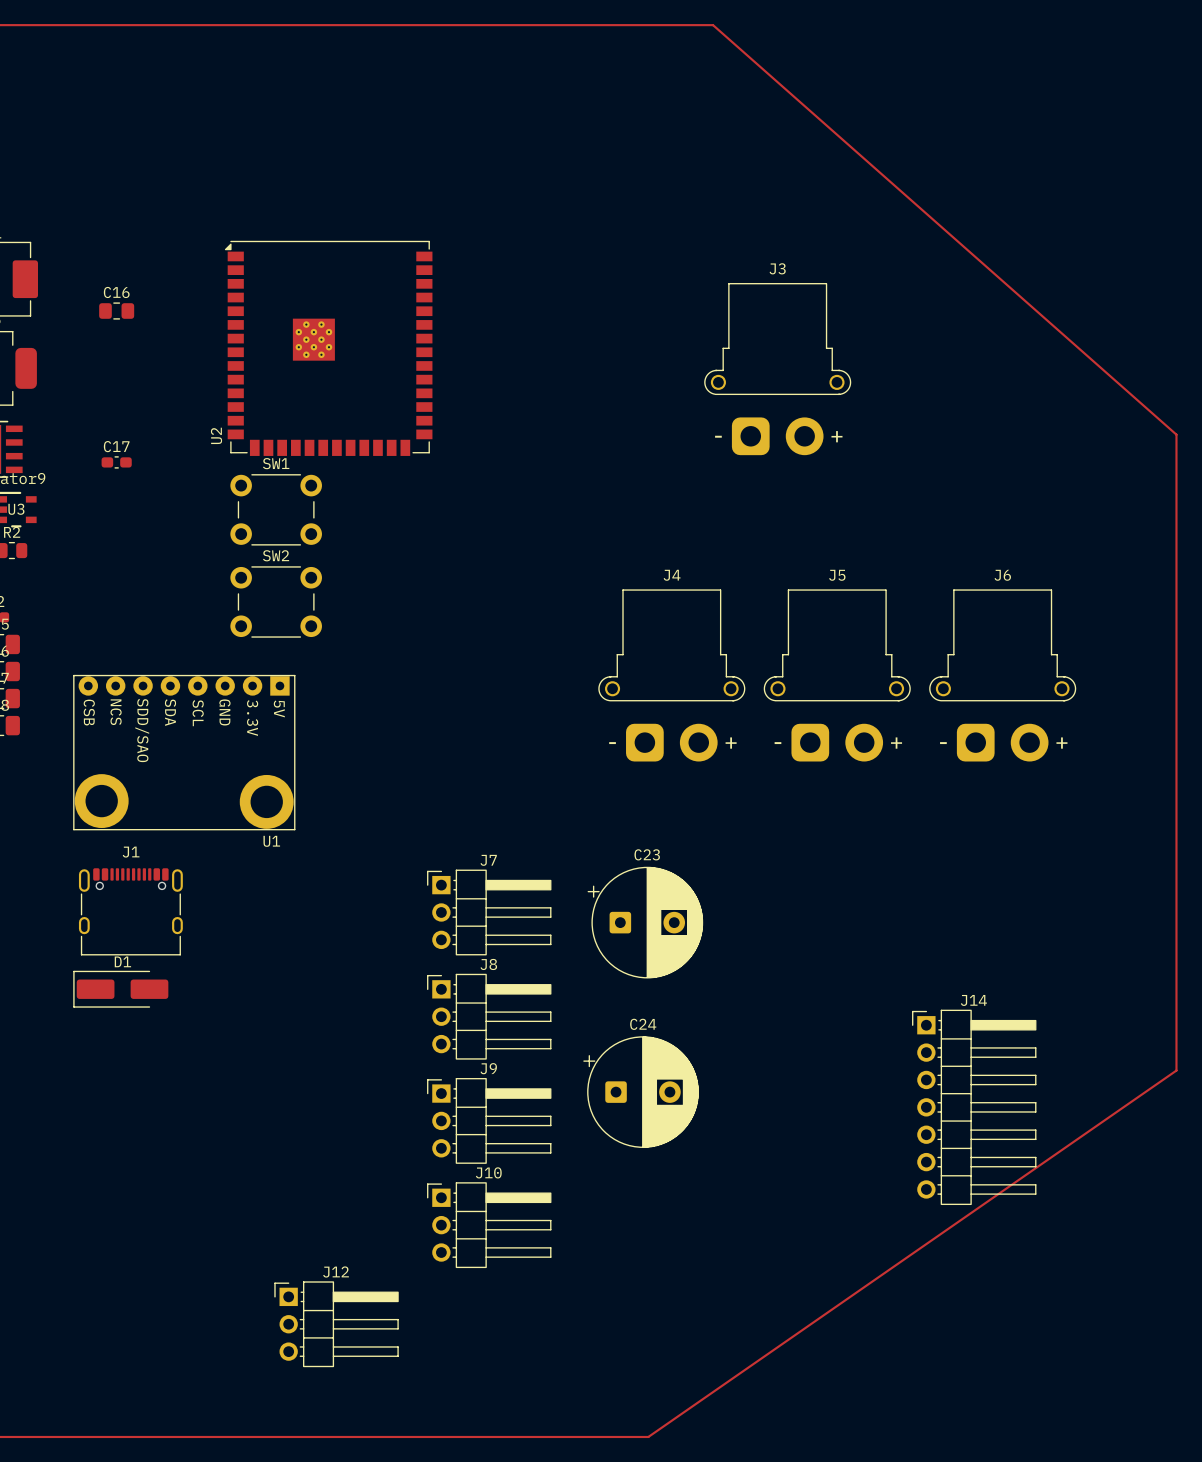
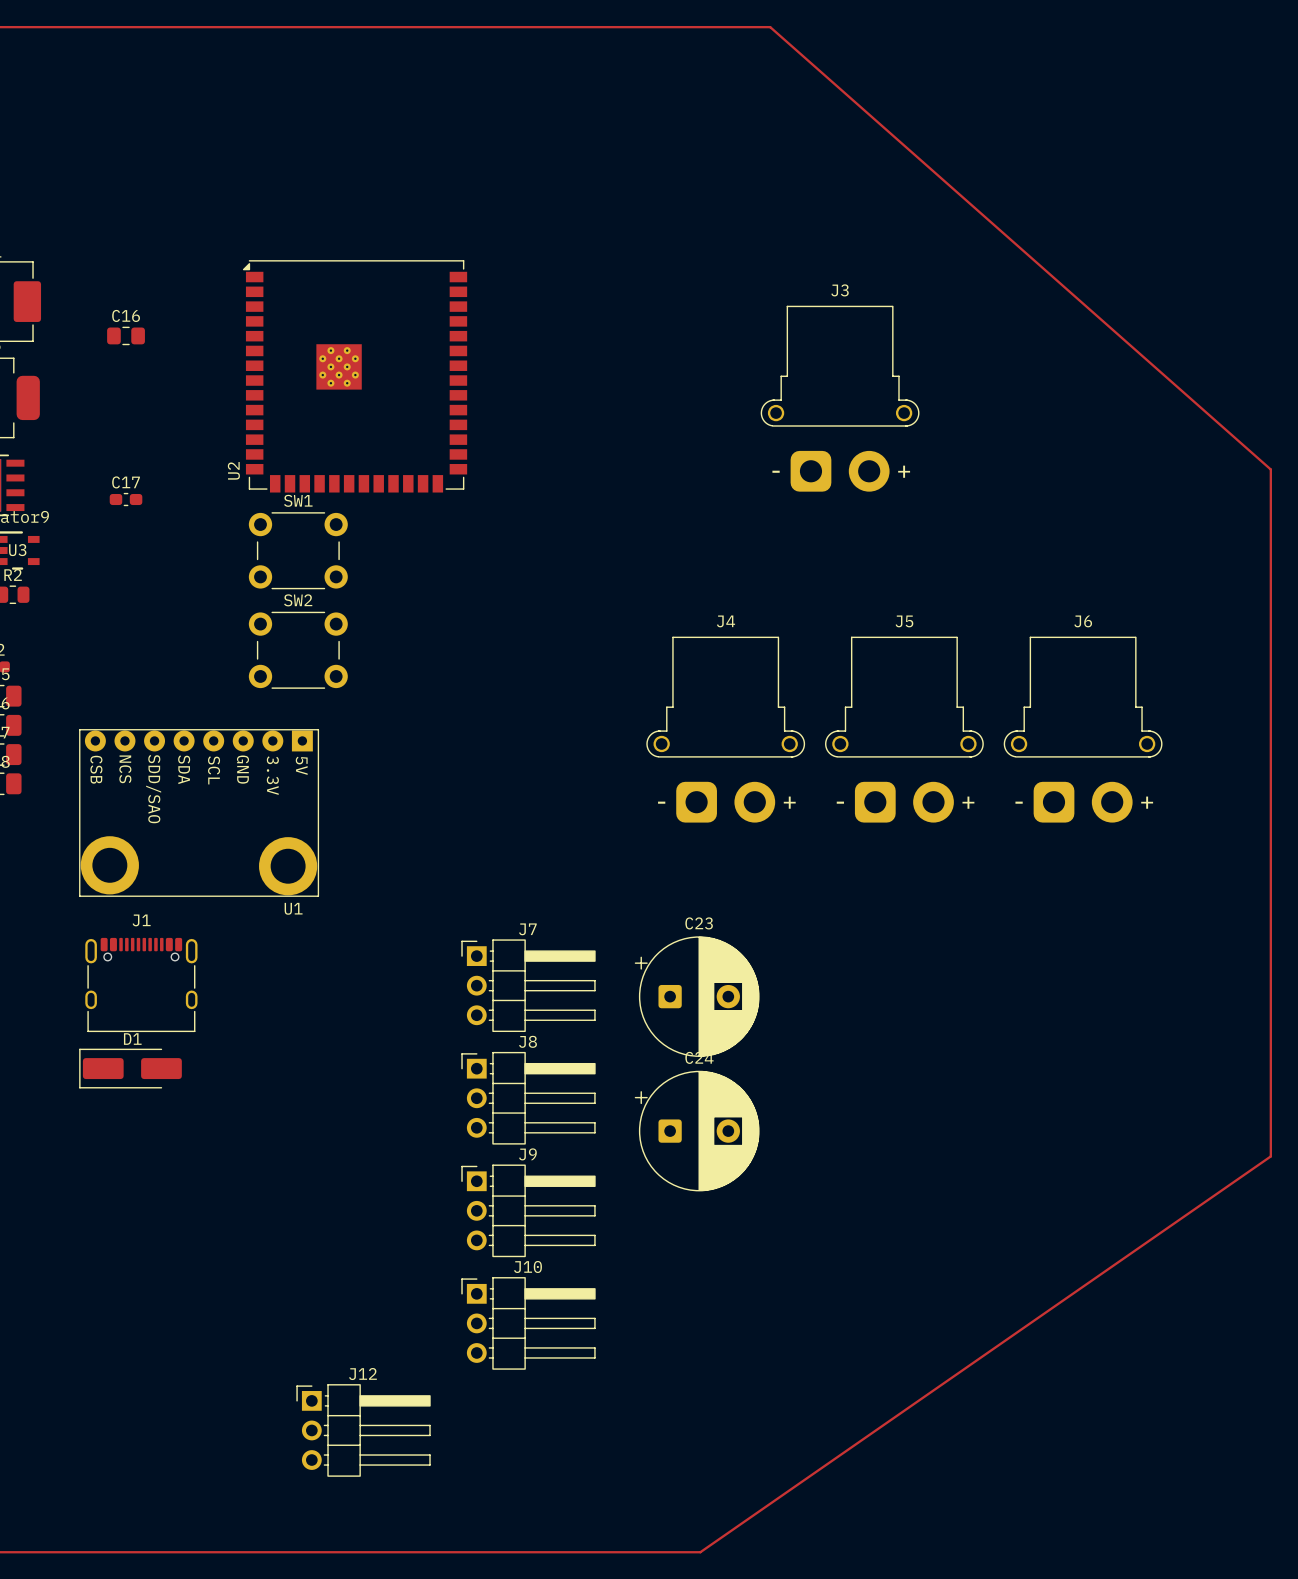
C24 position: (641, 1092) -> (697, 1131)
J14: (974, 1107) -> none

